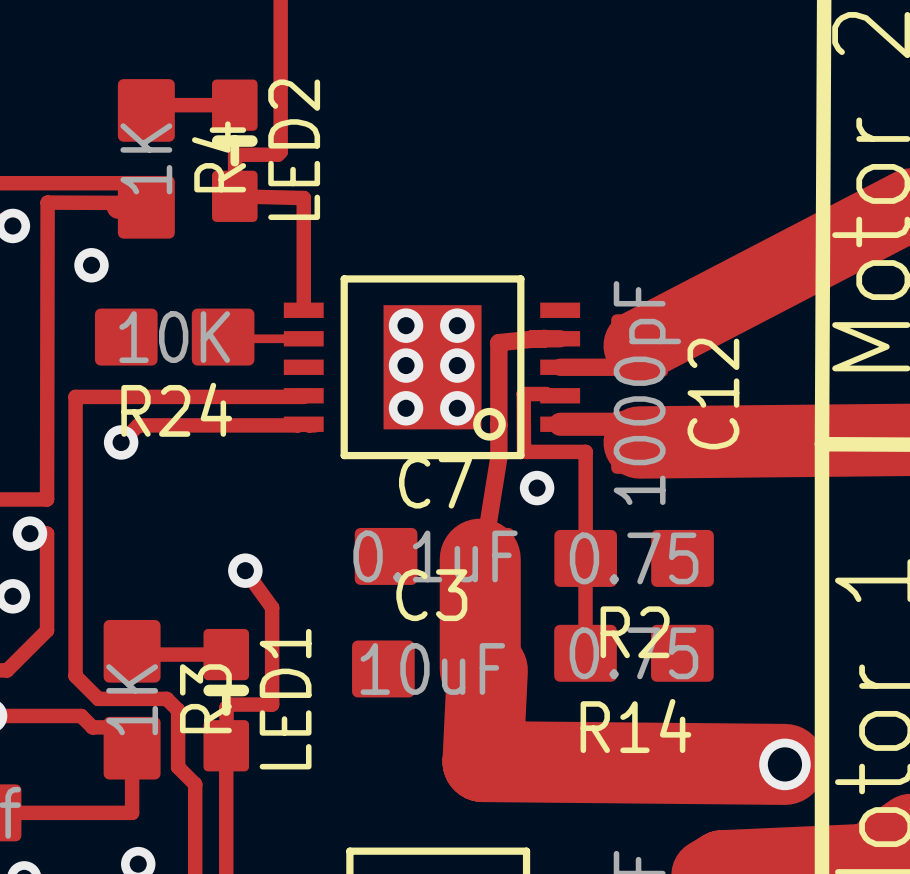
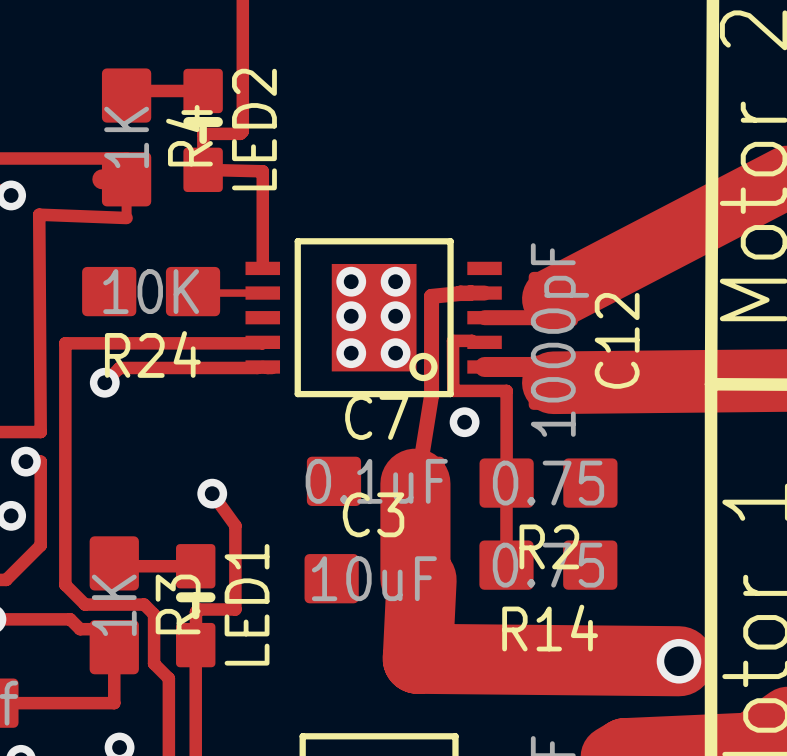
track: (146, 207) (148, 203) (47, 202) (47, 499) -> (126, 179) (126, 218) (39, 214) (40, 432)
via: (91, 265) -> none

